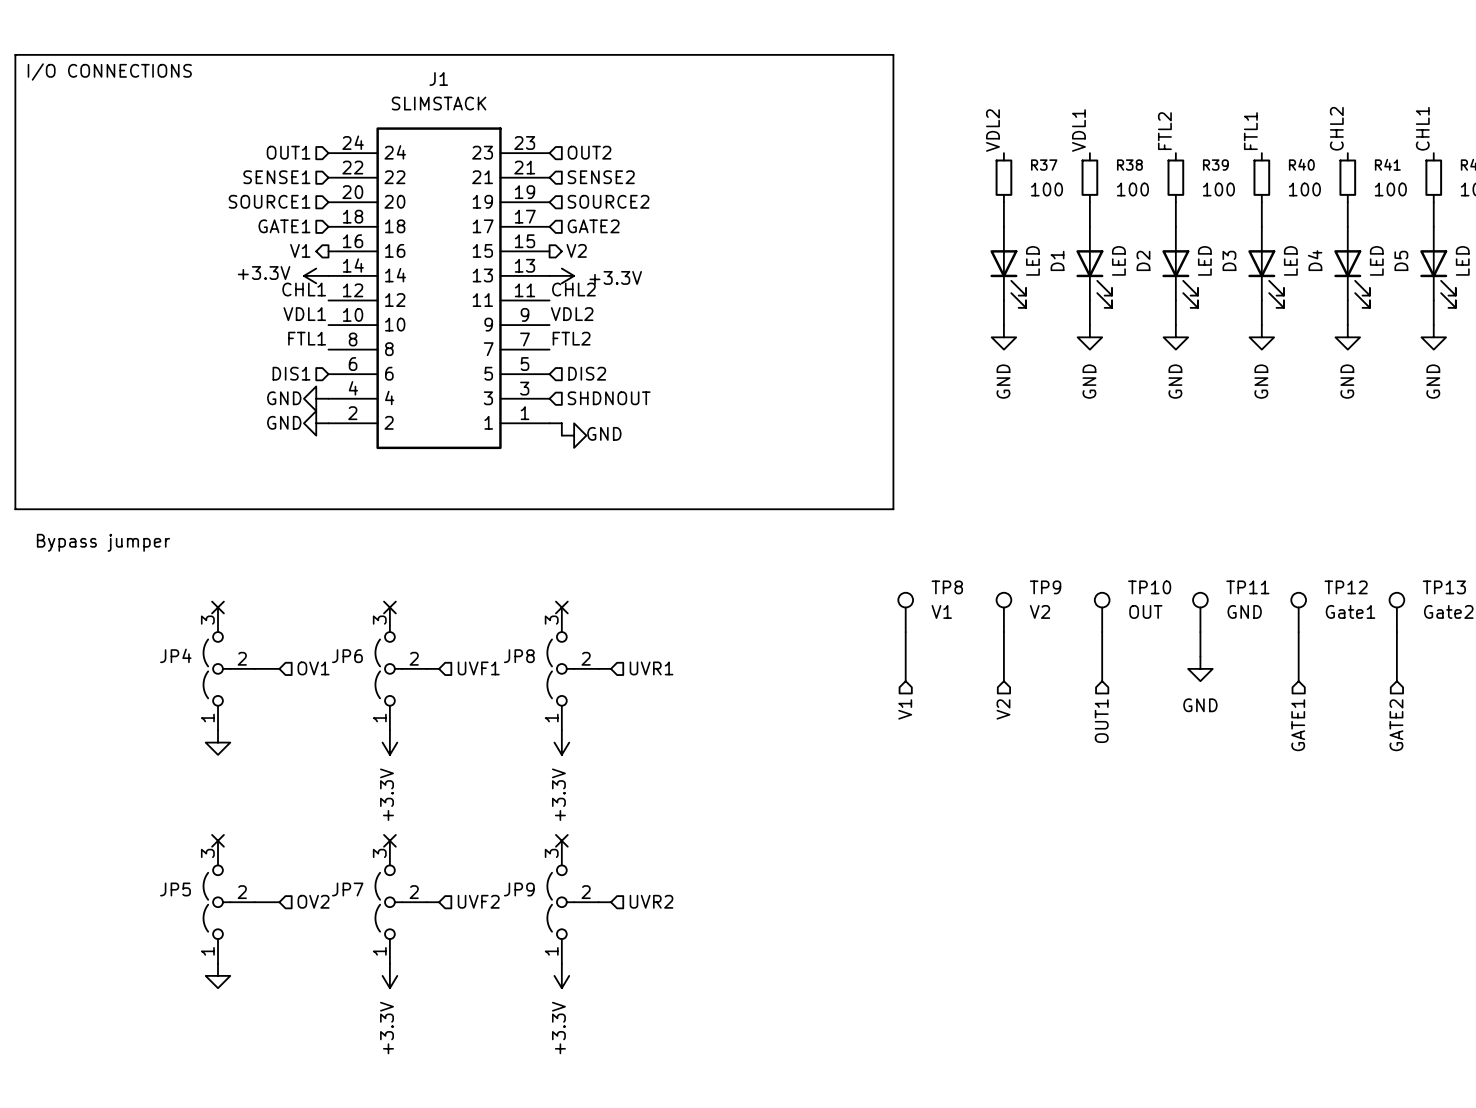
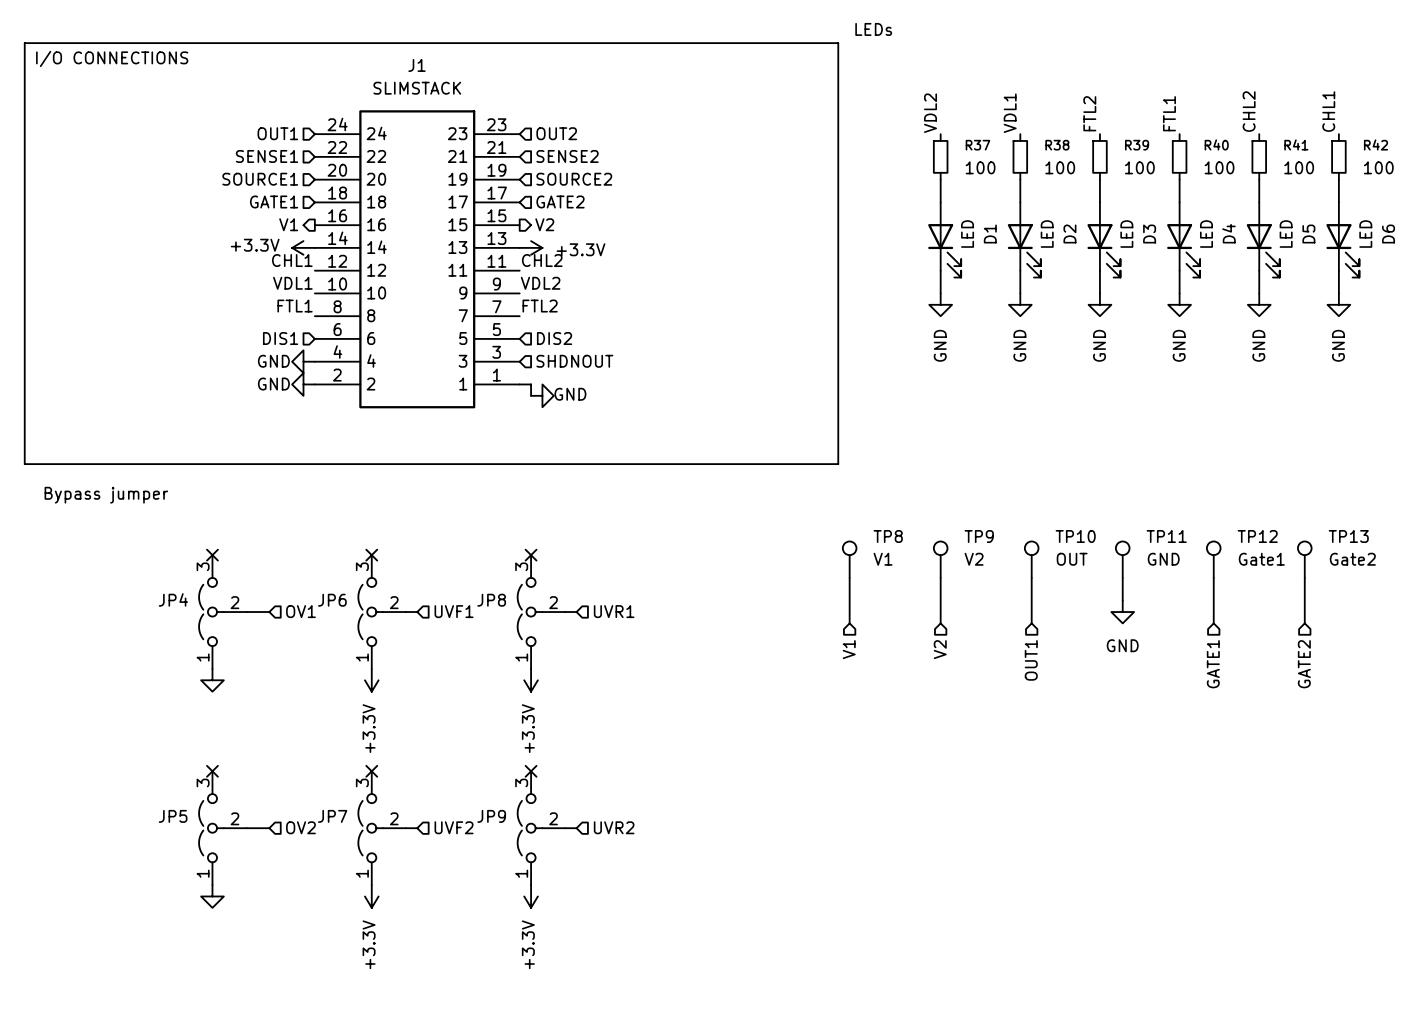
text: none -> LEDs (873, 29)

